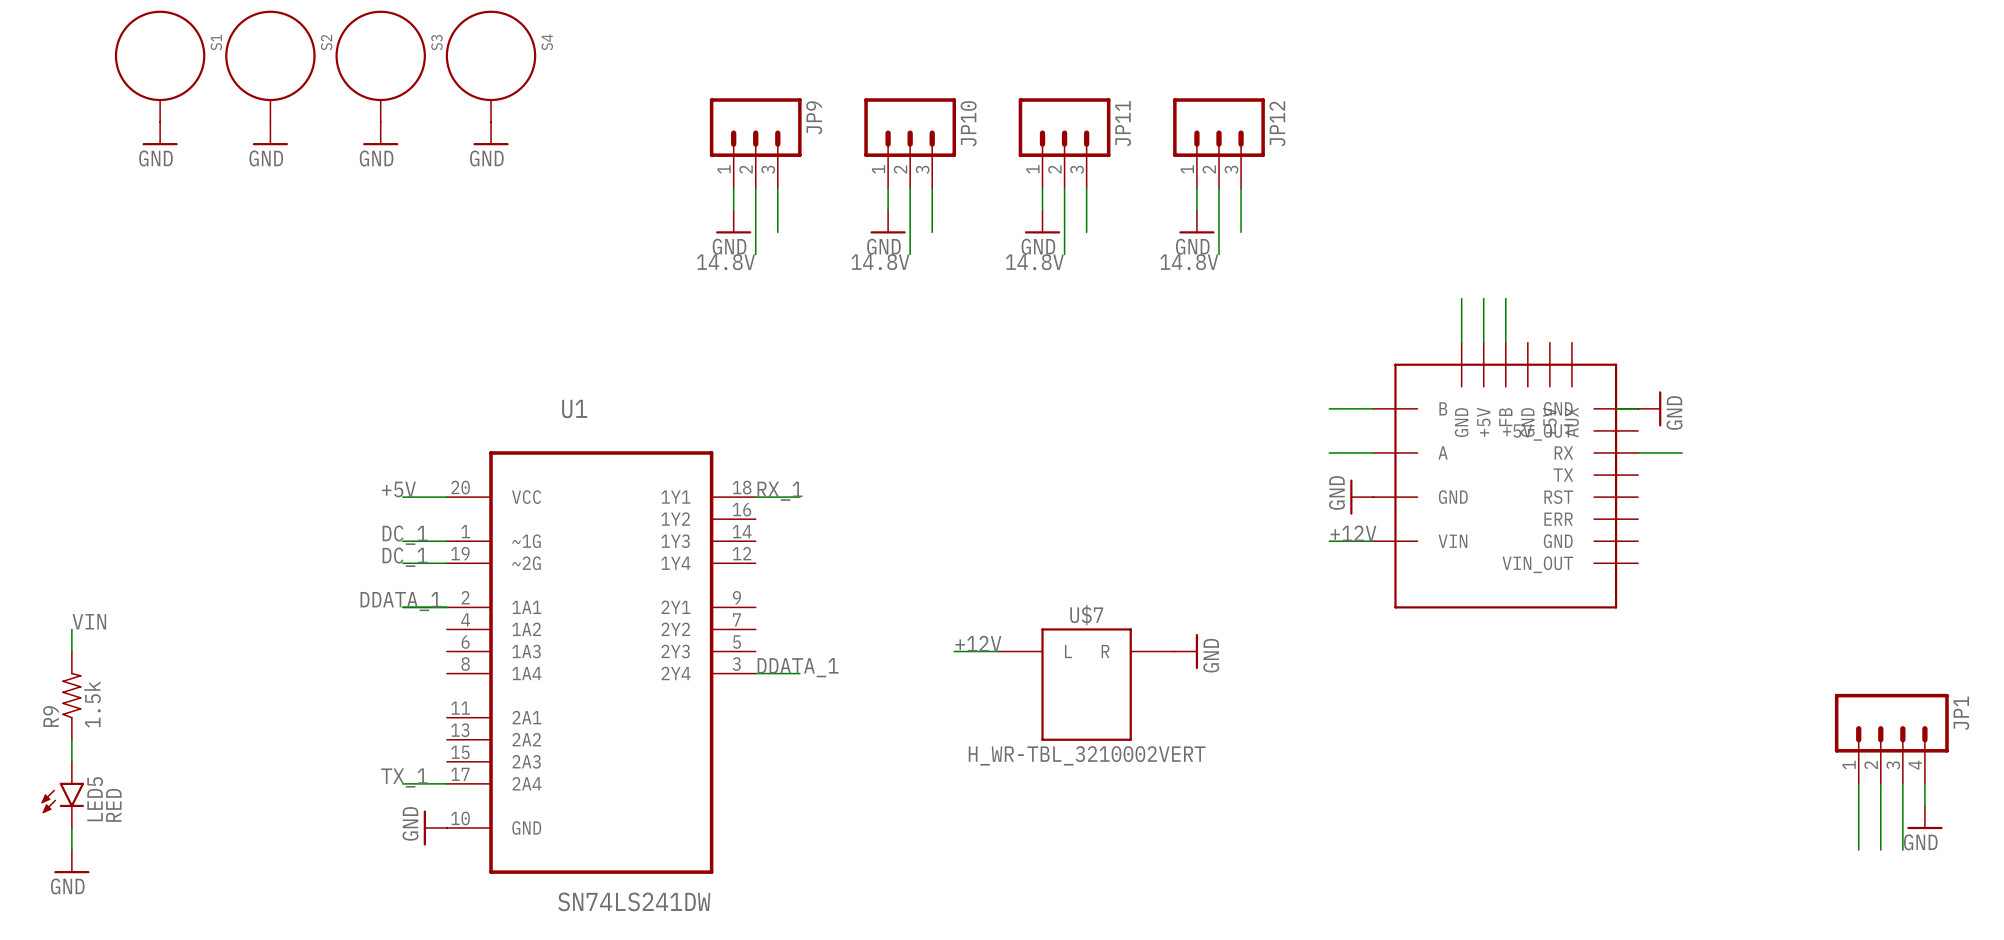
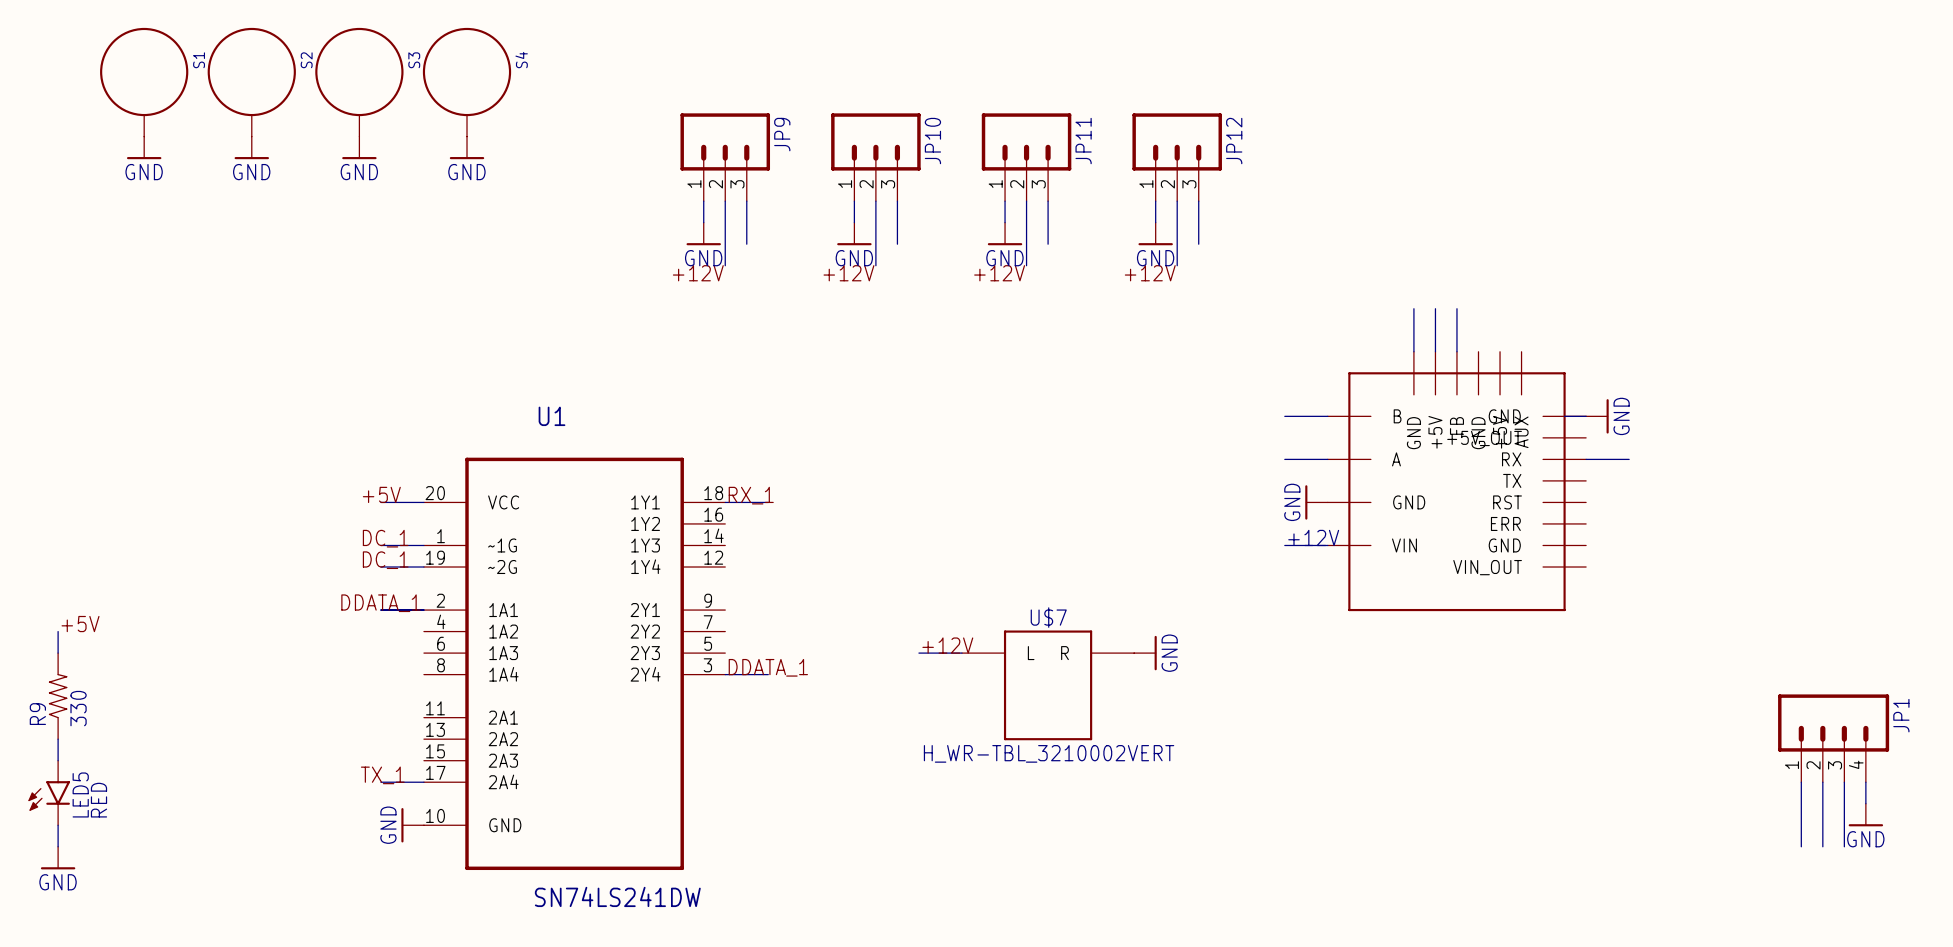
label: 14.8V (726, 262) -> +12V (698, 273)
label: 14.8V (880, 262) -> +12V (848, 273)
label: 14.8V (1034, 262) -> +12V (999, 273)
label: 14.8V (1189, 262) -> +12V (1150, 273)
label: VIN (89, 621) -> +5V (80, 624)
R9 value: 1.5k (92, 704) -> 330 (78, 708)

